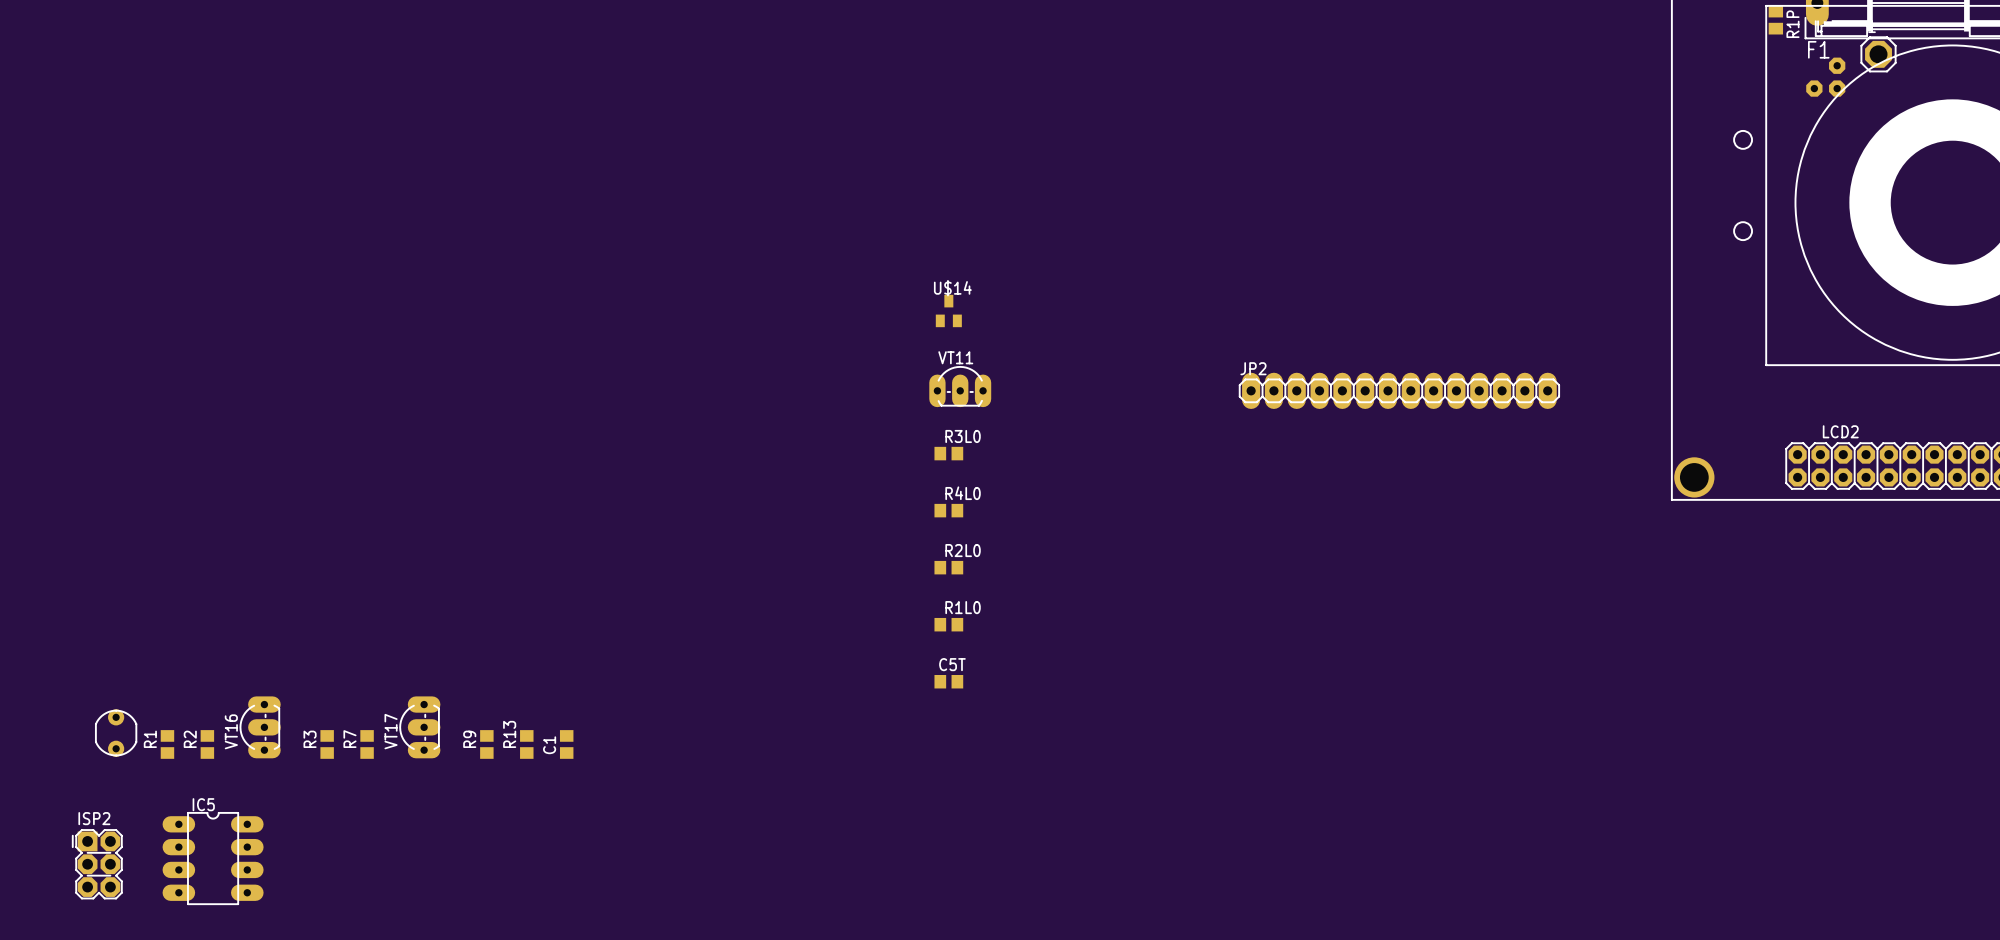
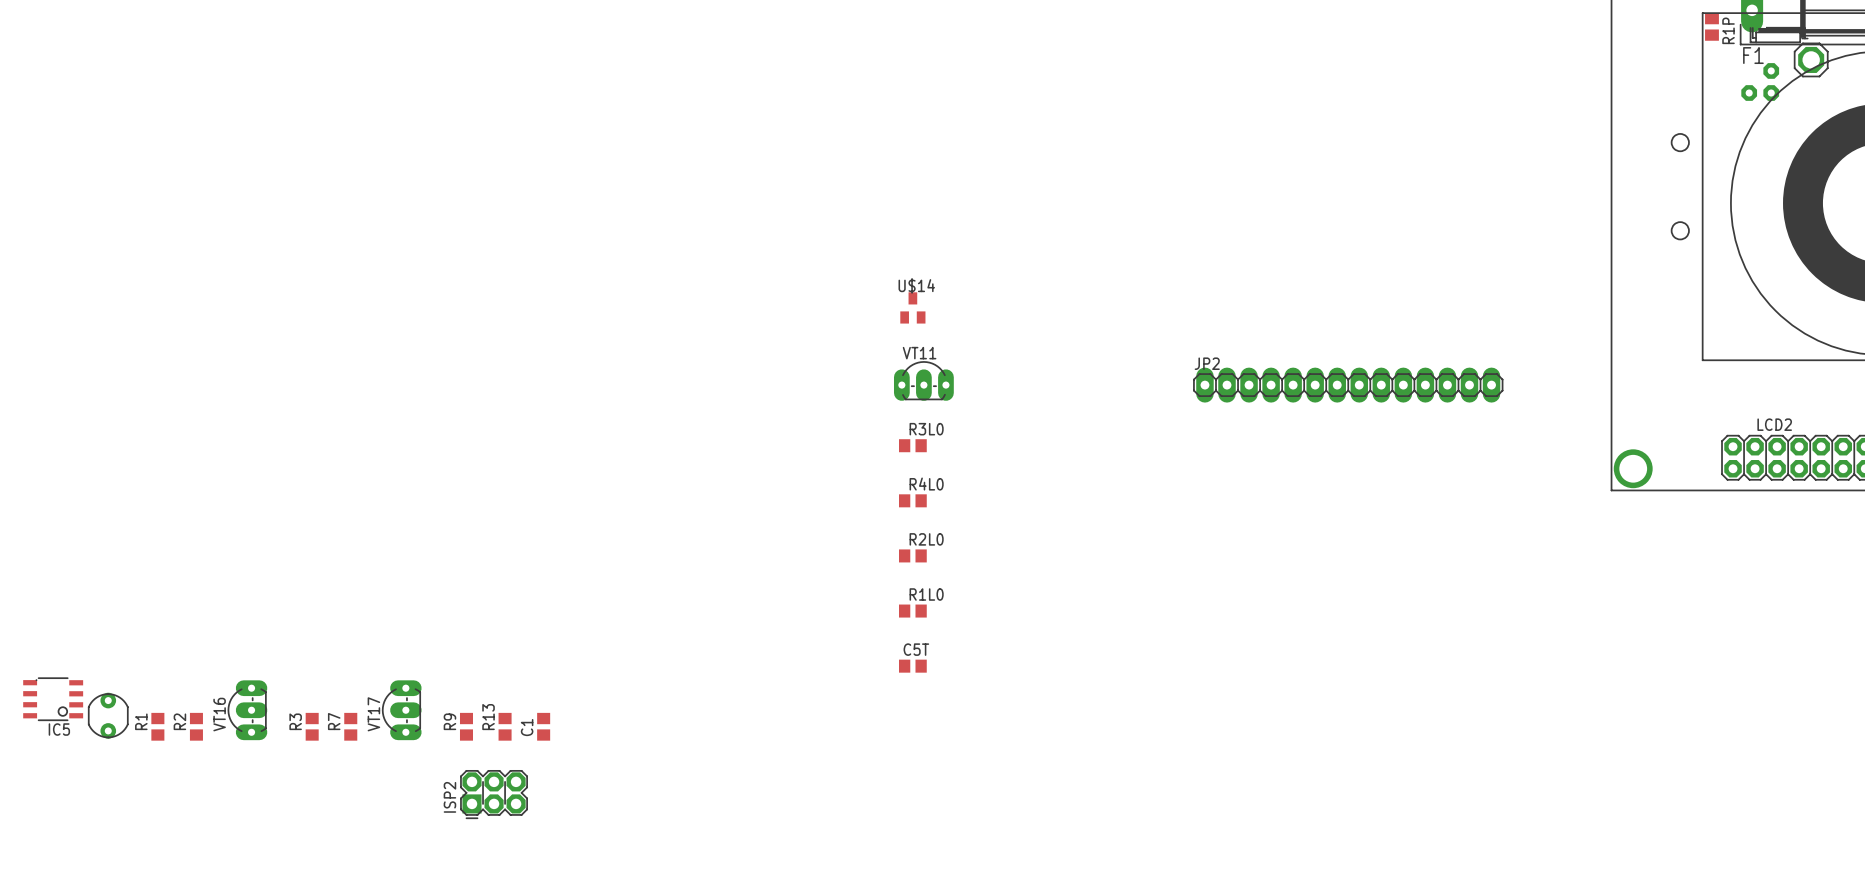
IC5 name position: IC5 (203, 804) -> IC5 (59, 729)
IC5 footprint: [162, 812, 264, 905] -> [23, 677, 84, 721]
ISP2 rotation: 0° (97, 864) -> 90° counterclockwise (494, 794)
ISP2 position: (97, 864) -> (494, 794)

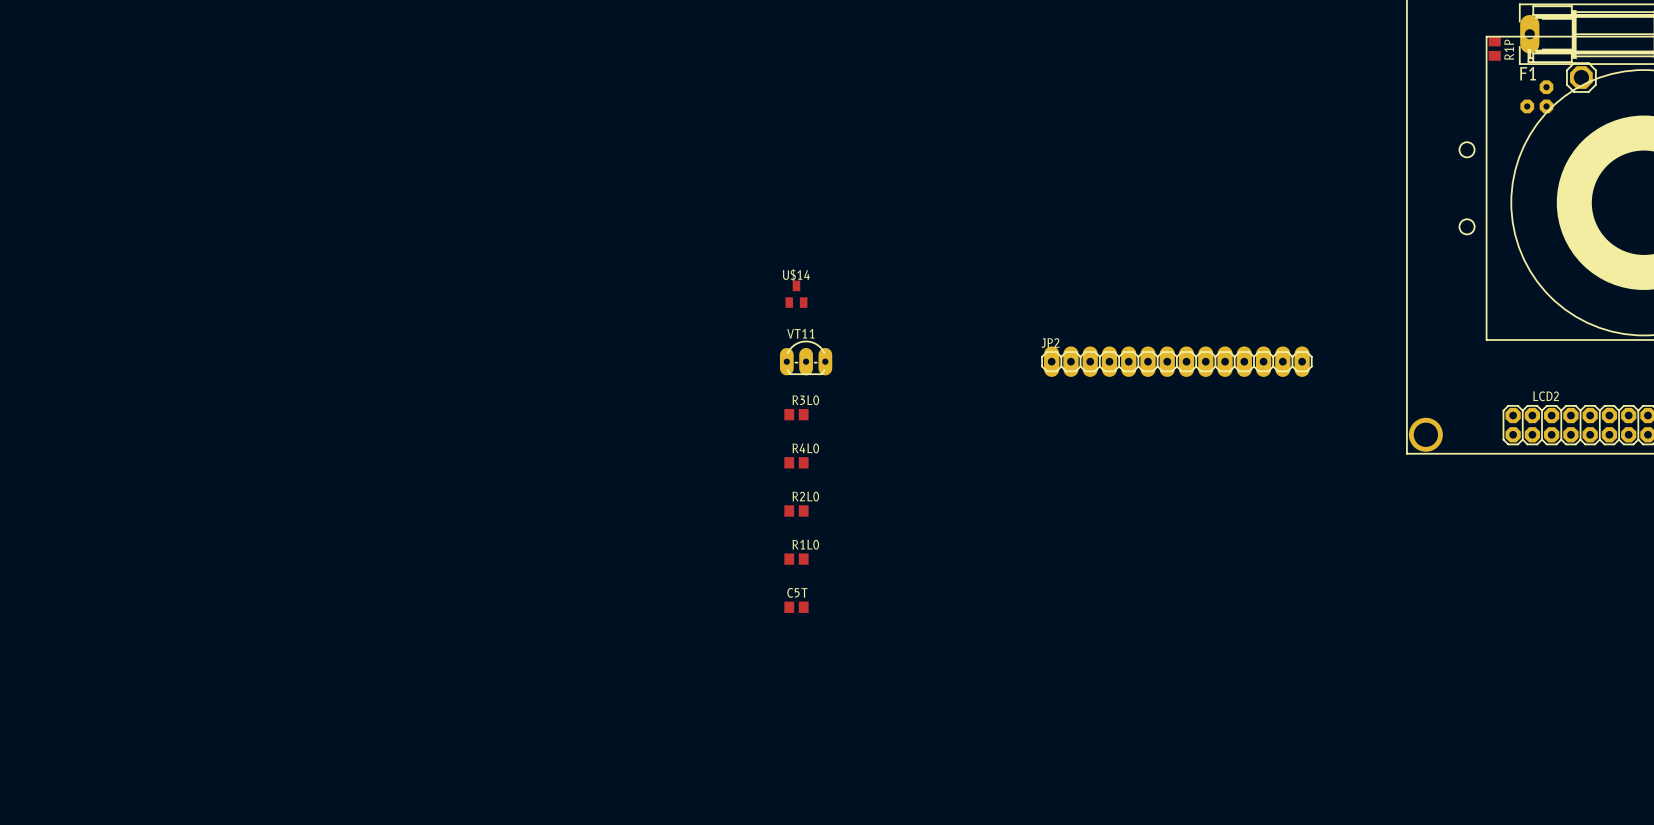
IC5: (53, 699) -> none
VT16: (247, 710) -> none
VT17: (401, 710) -> none
part: (108, 715) -> none
R1: (157, 726) -> none
R2: (196, 726) -> none
R3: (312, 726) -> none
R7: (350, 726) -> none
R9: (466, 726) -> none
R13: (505, 726) -> none
C1: (543, 726) -> none
ISP2: (494, 794) -> none

